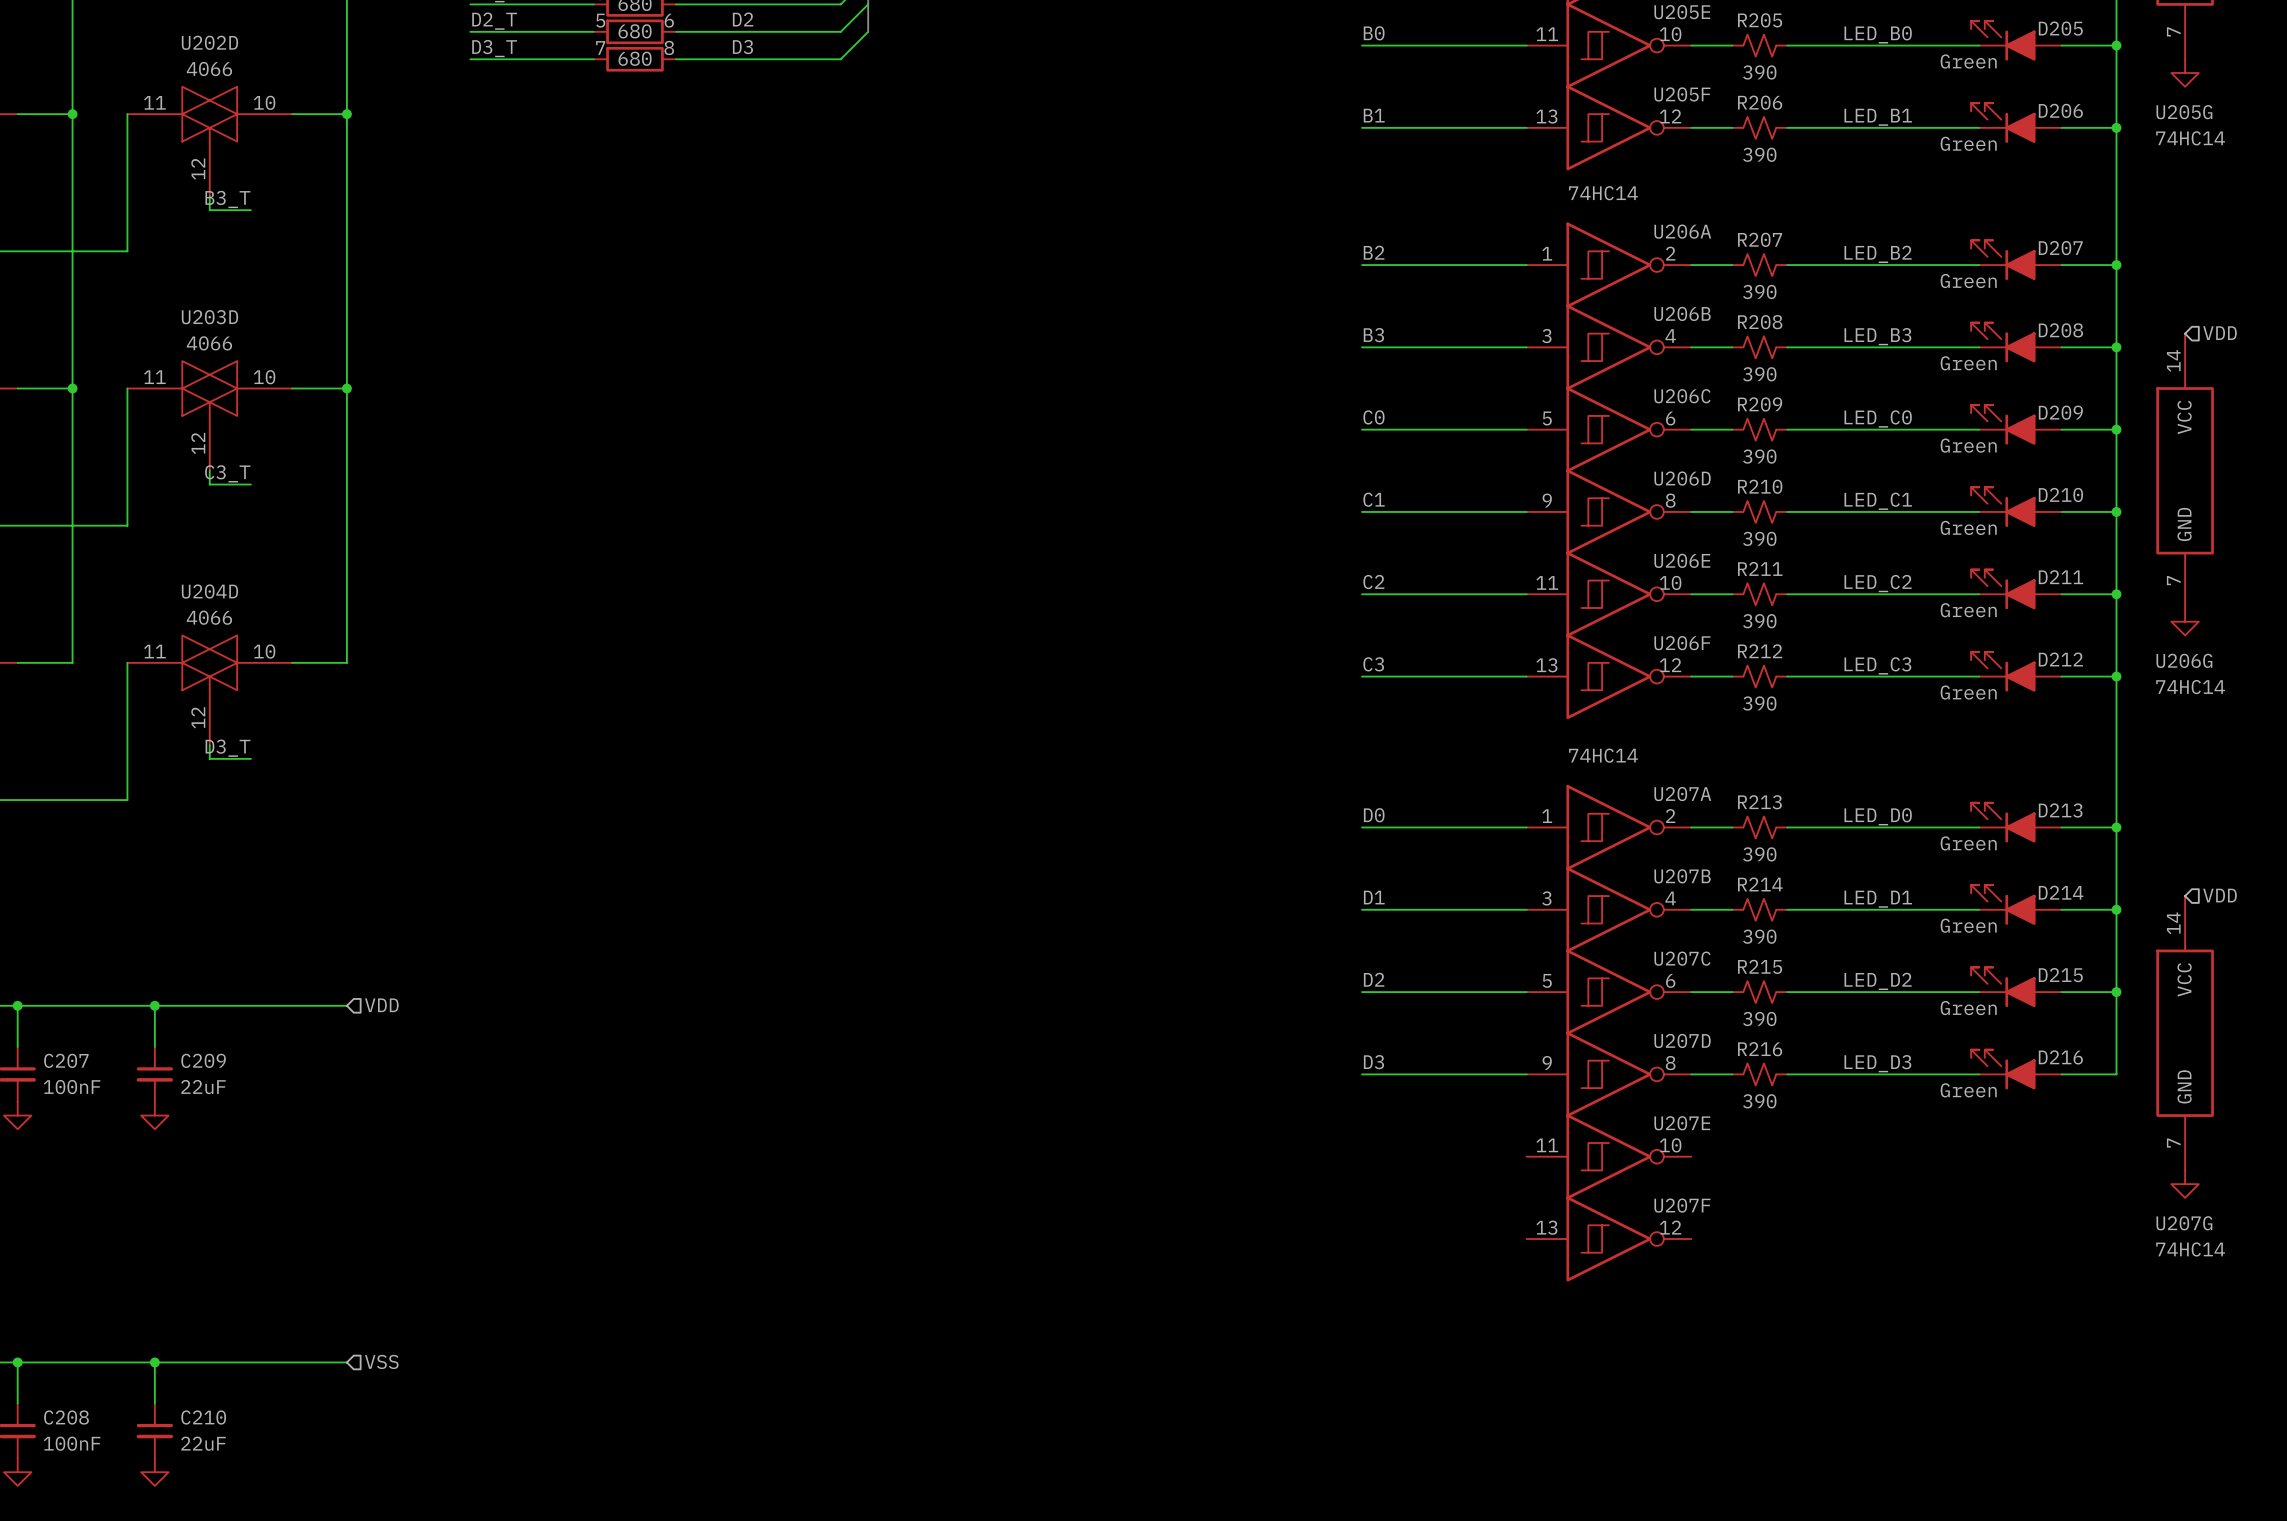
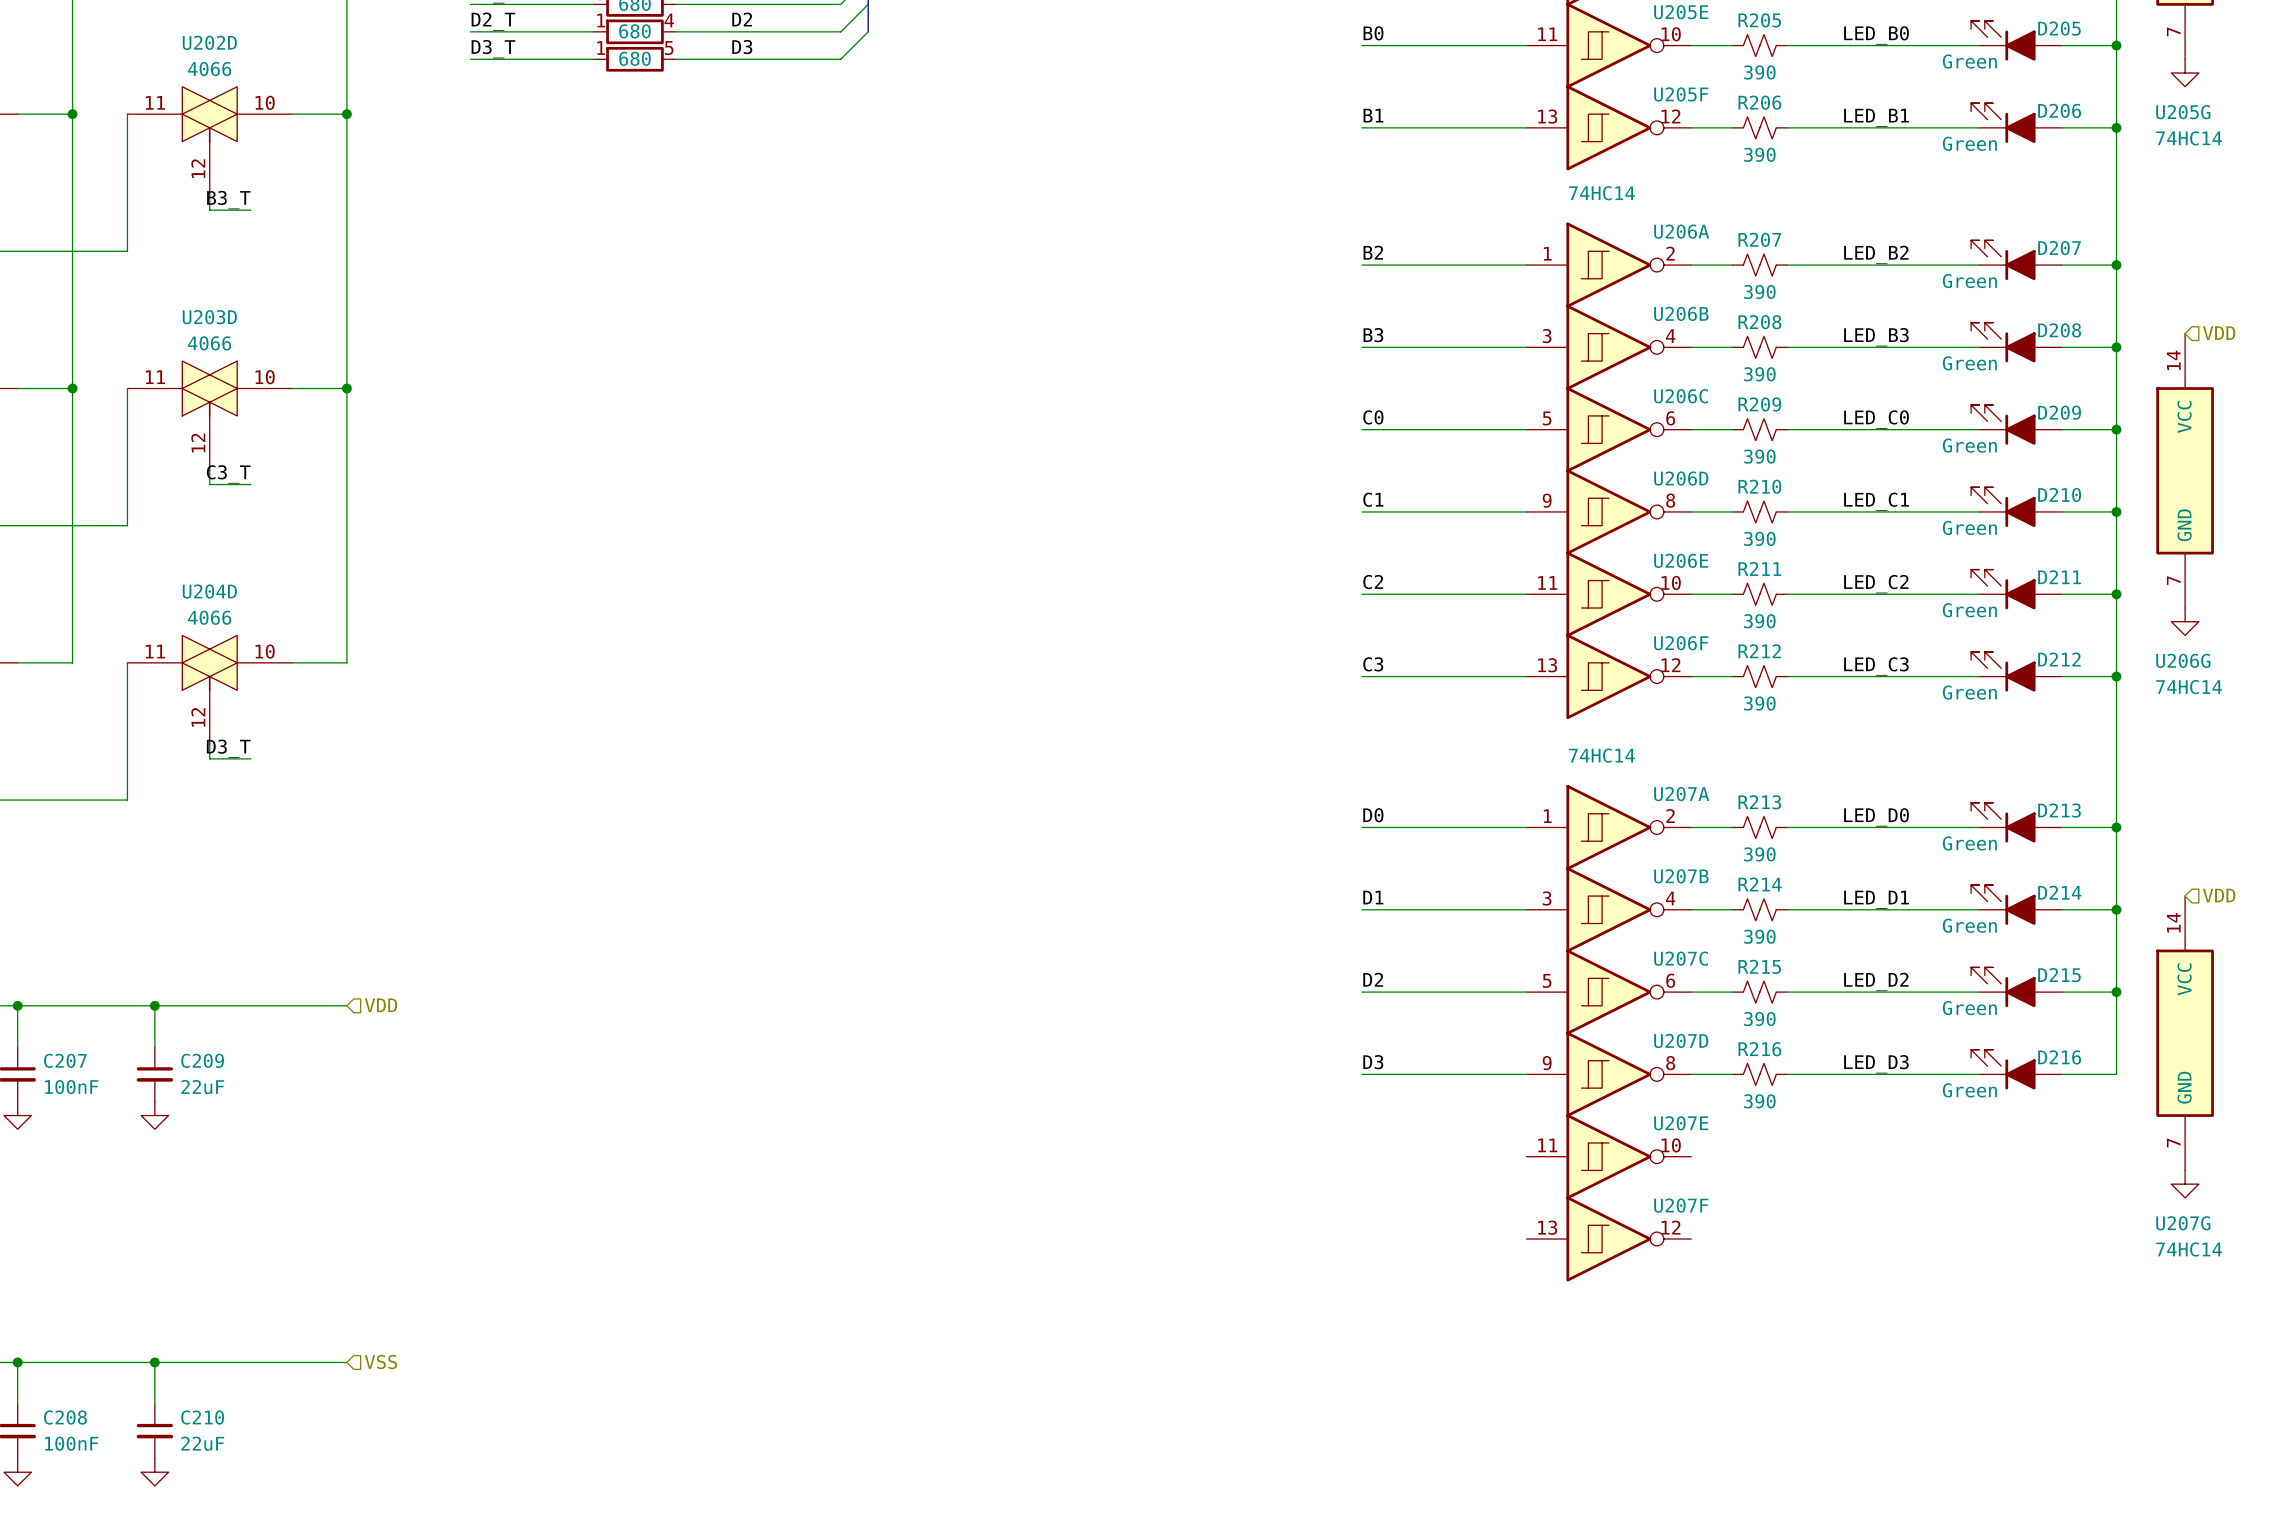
part pin number: 5 (600, 20) -> 1 (601, 20)
part pin number: 6 (669, 20) -> 4 (669, 20)
part pin number: 7 (600, 47) -> 1 (601, 47)
part pin number: 8 (669, 47) -> 5 (669, 48)

